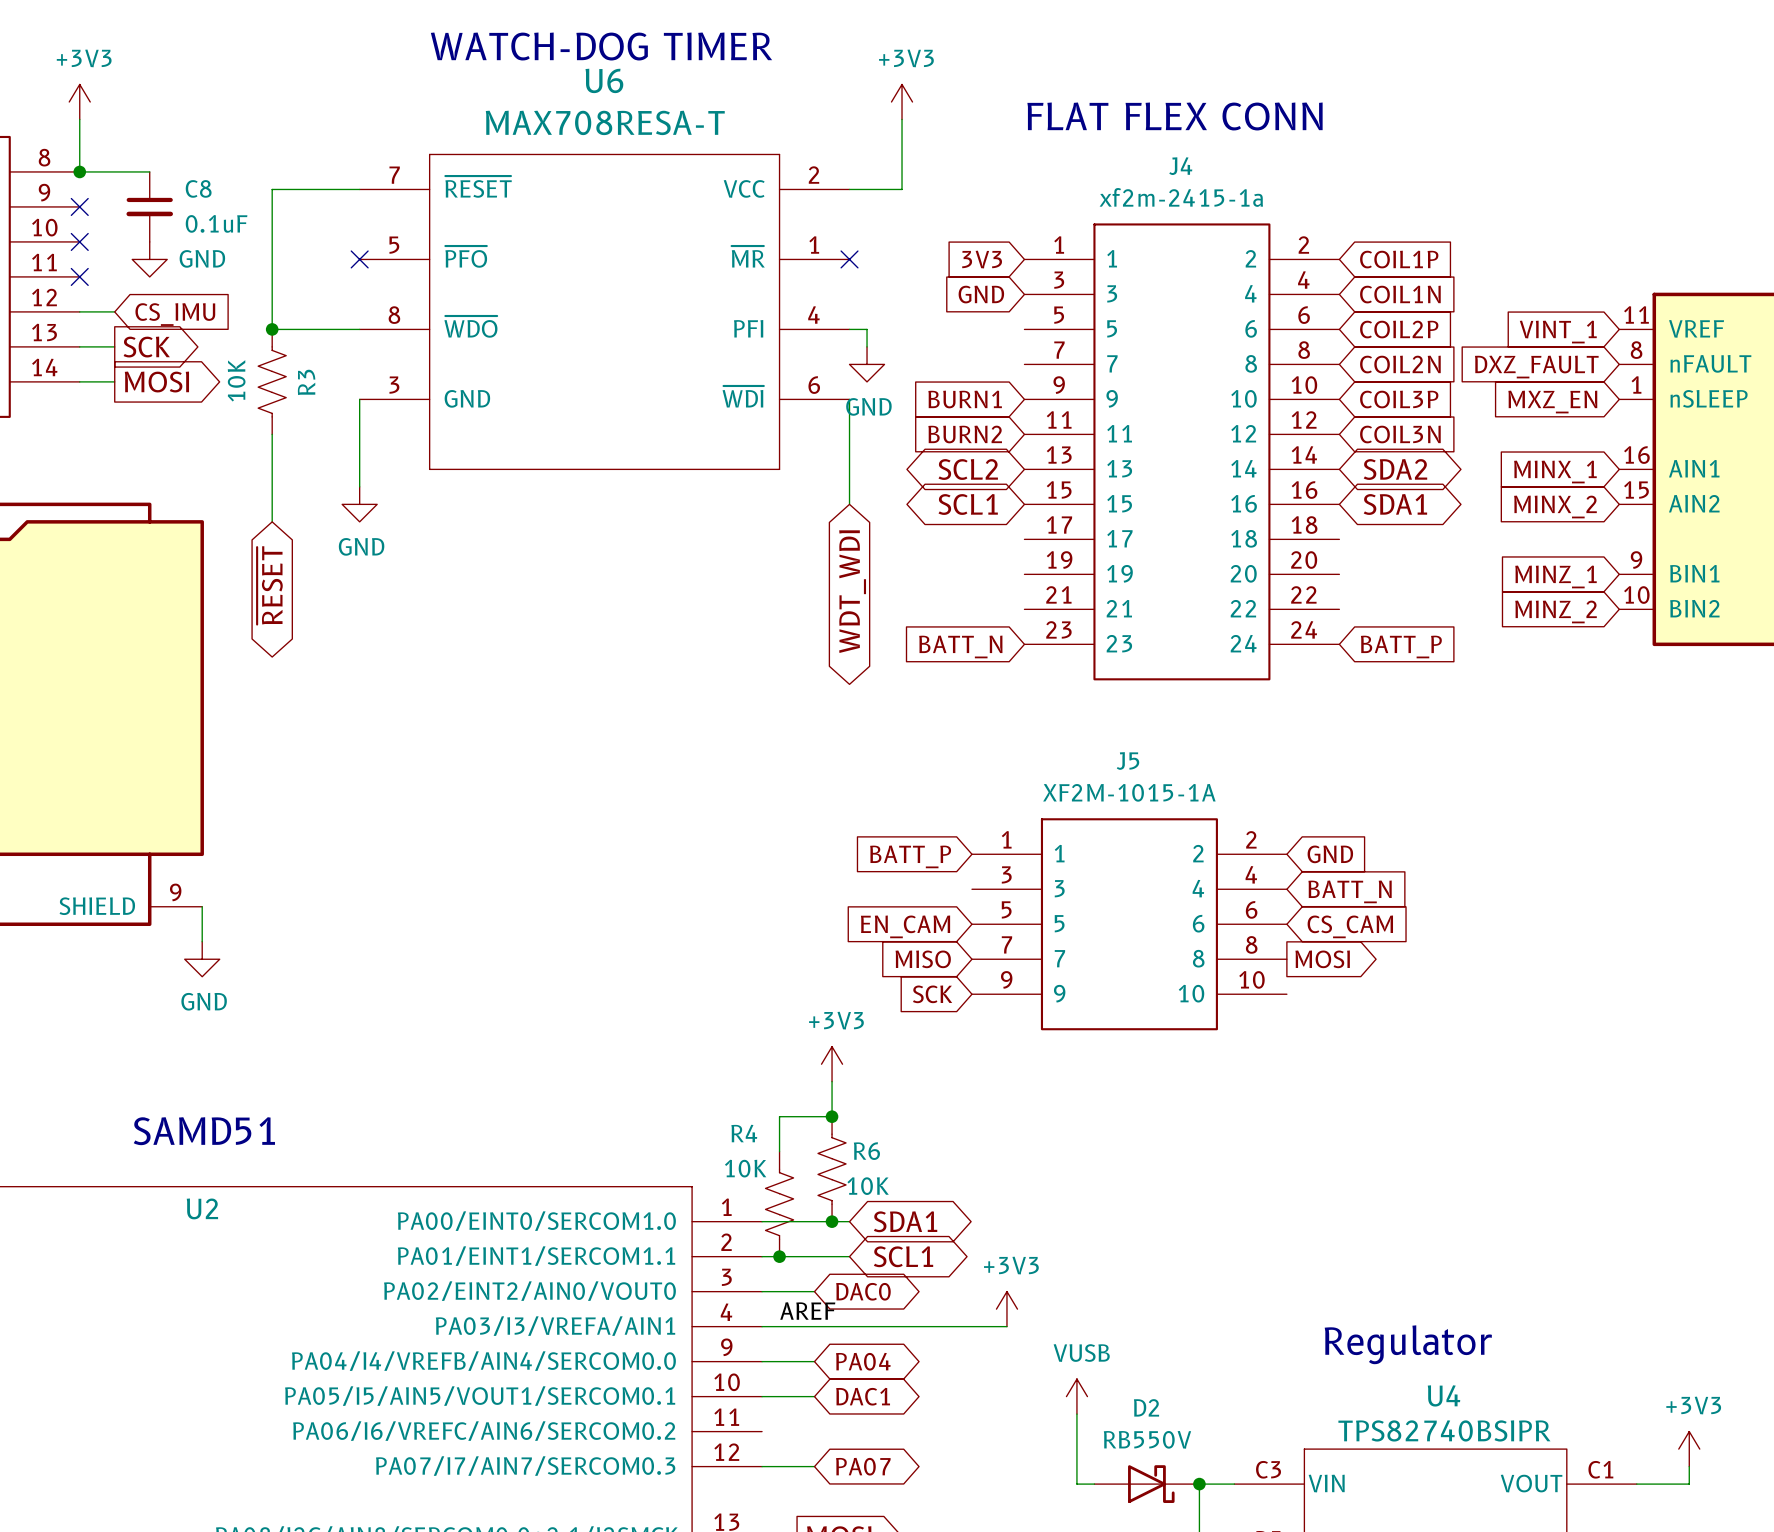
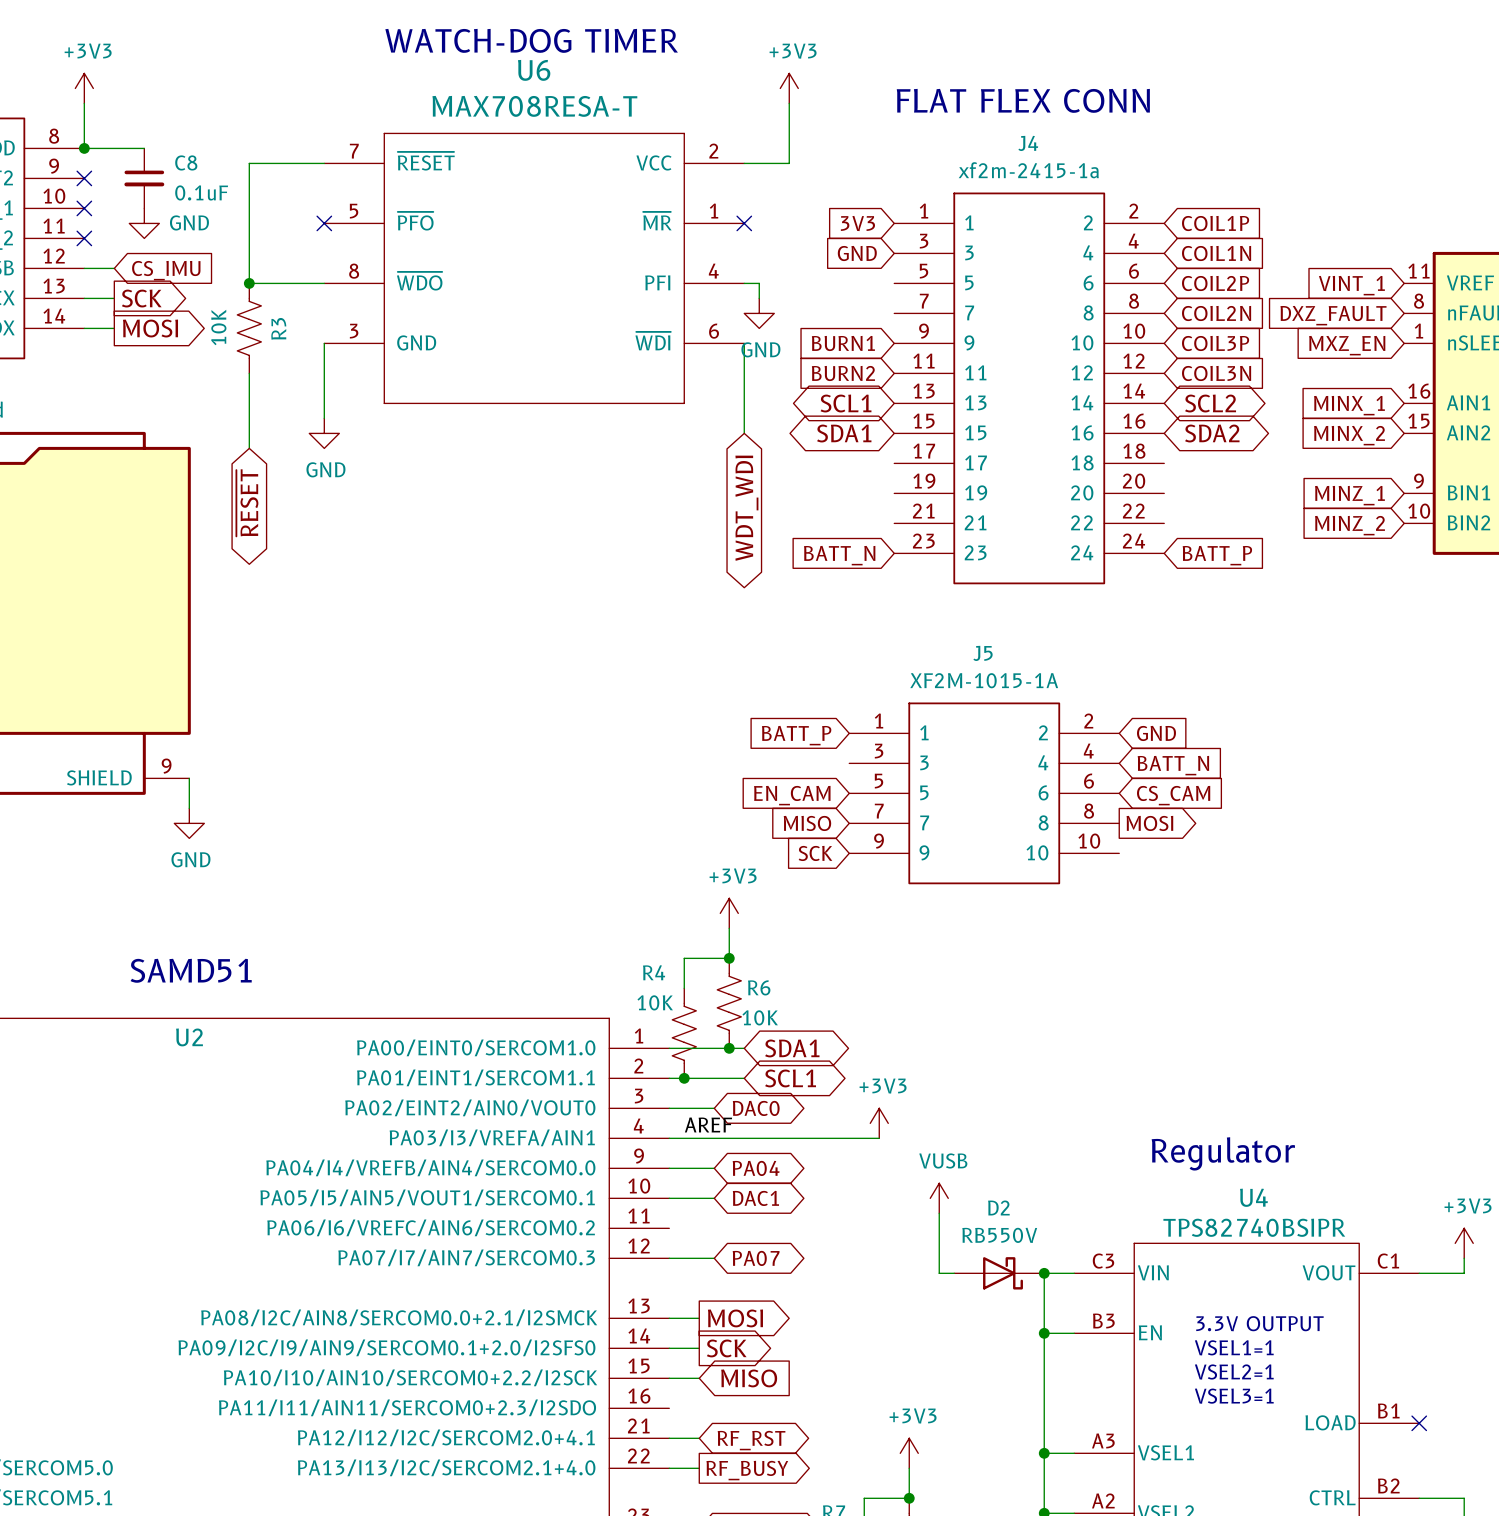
global label: SCL2 (968, 469) -> SCL1 (846, 403)
global label: SDA2 (1395, 469) -> SCL2 (1210, 403)
global label: SCL1 (968, 504) -> SDA1 (844, 433)
global label: SDA1 (1395, 504) -> SDA2 (1212, 433)

